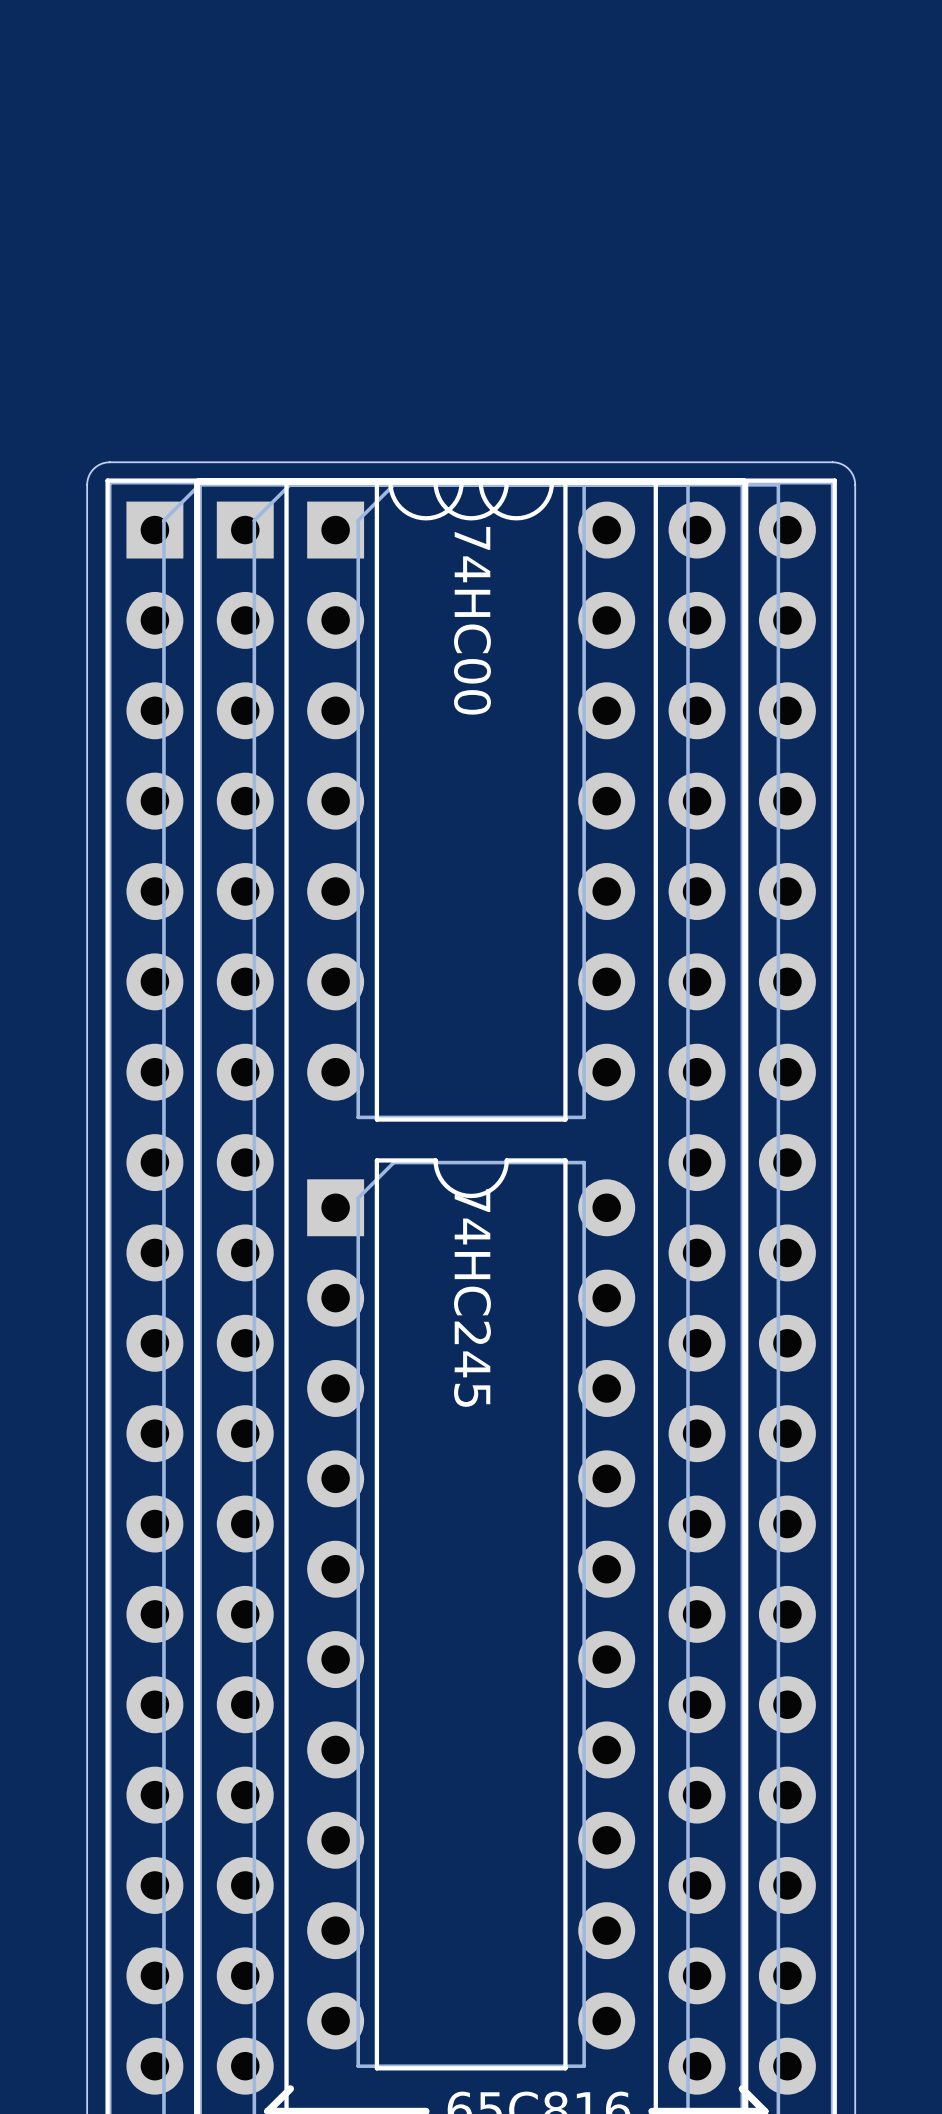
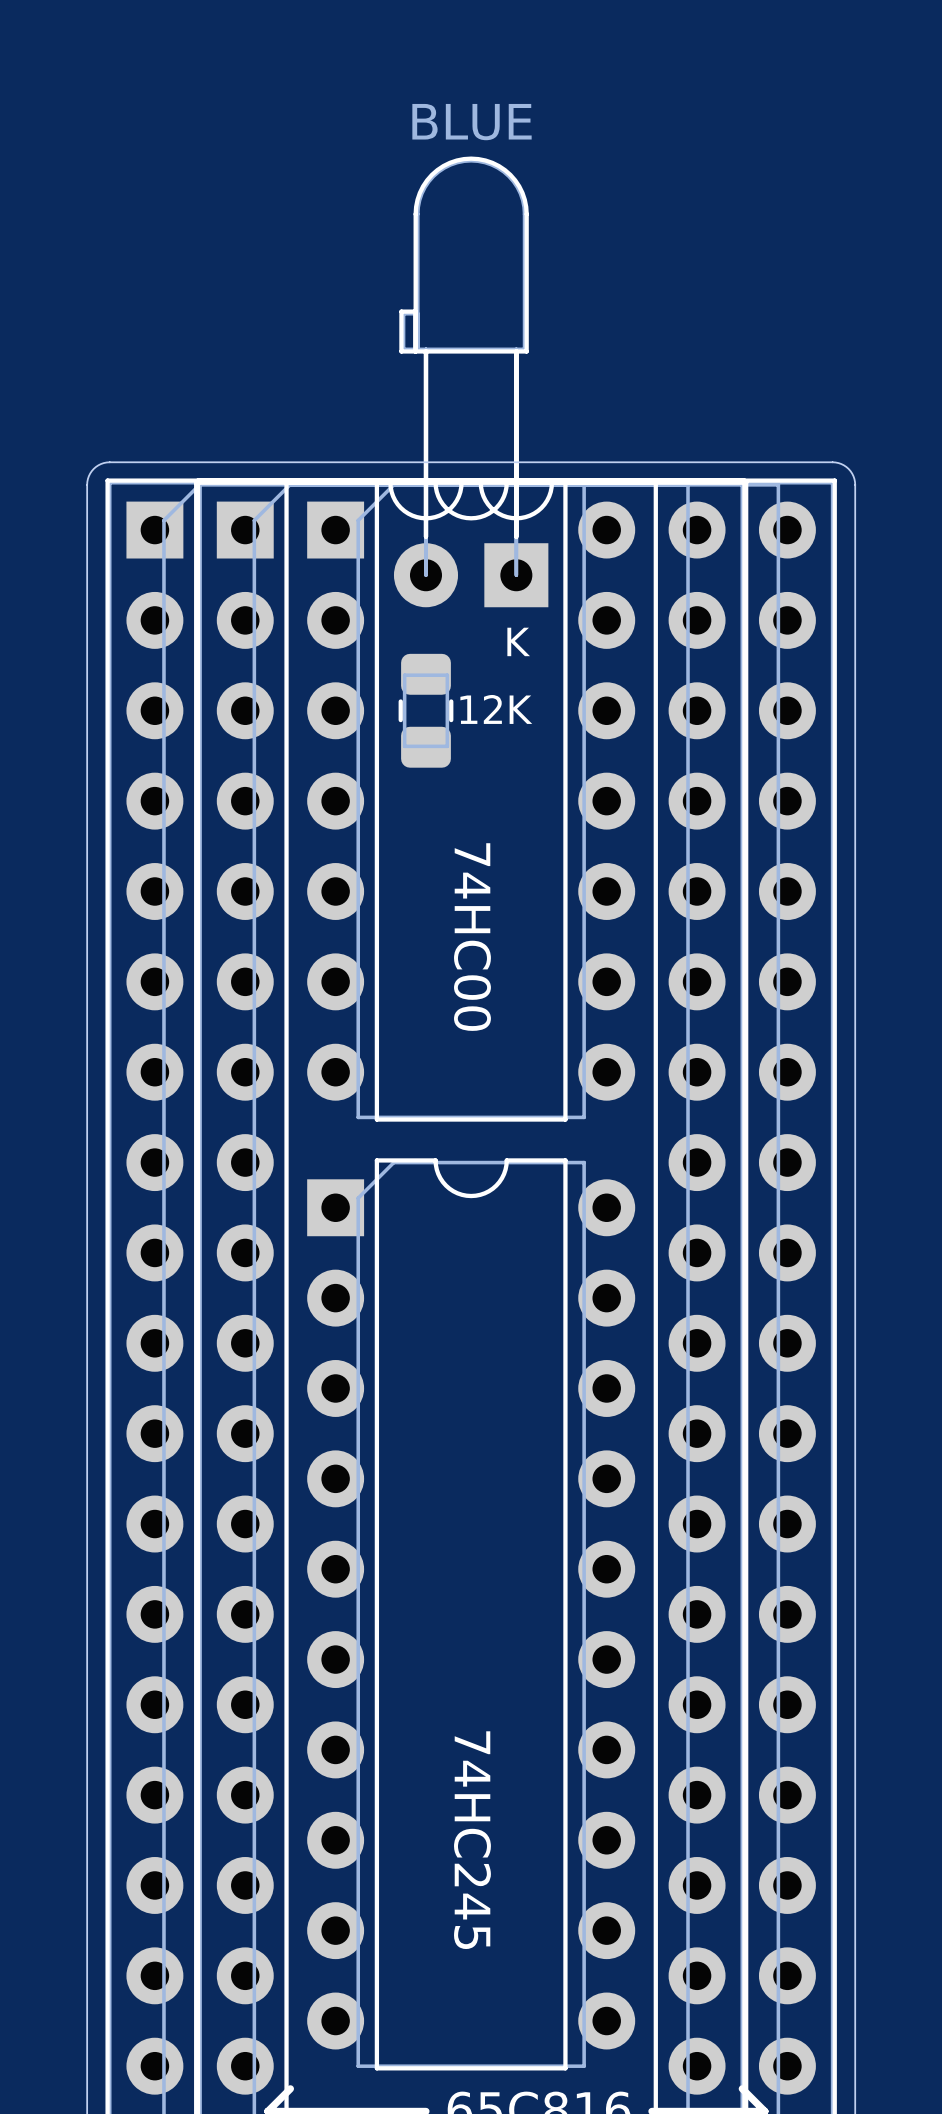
part: none -> BLUE (471, 381)
part value position: 74HC00 (472, 620) -> 74HC00 (472, 937)
text: none -> K (518, 641)
part: none -> 12K (425, 710)
part value position: 74HC245 (472, 1297) -> 74HC245 (472, 1840)

